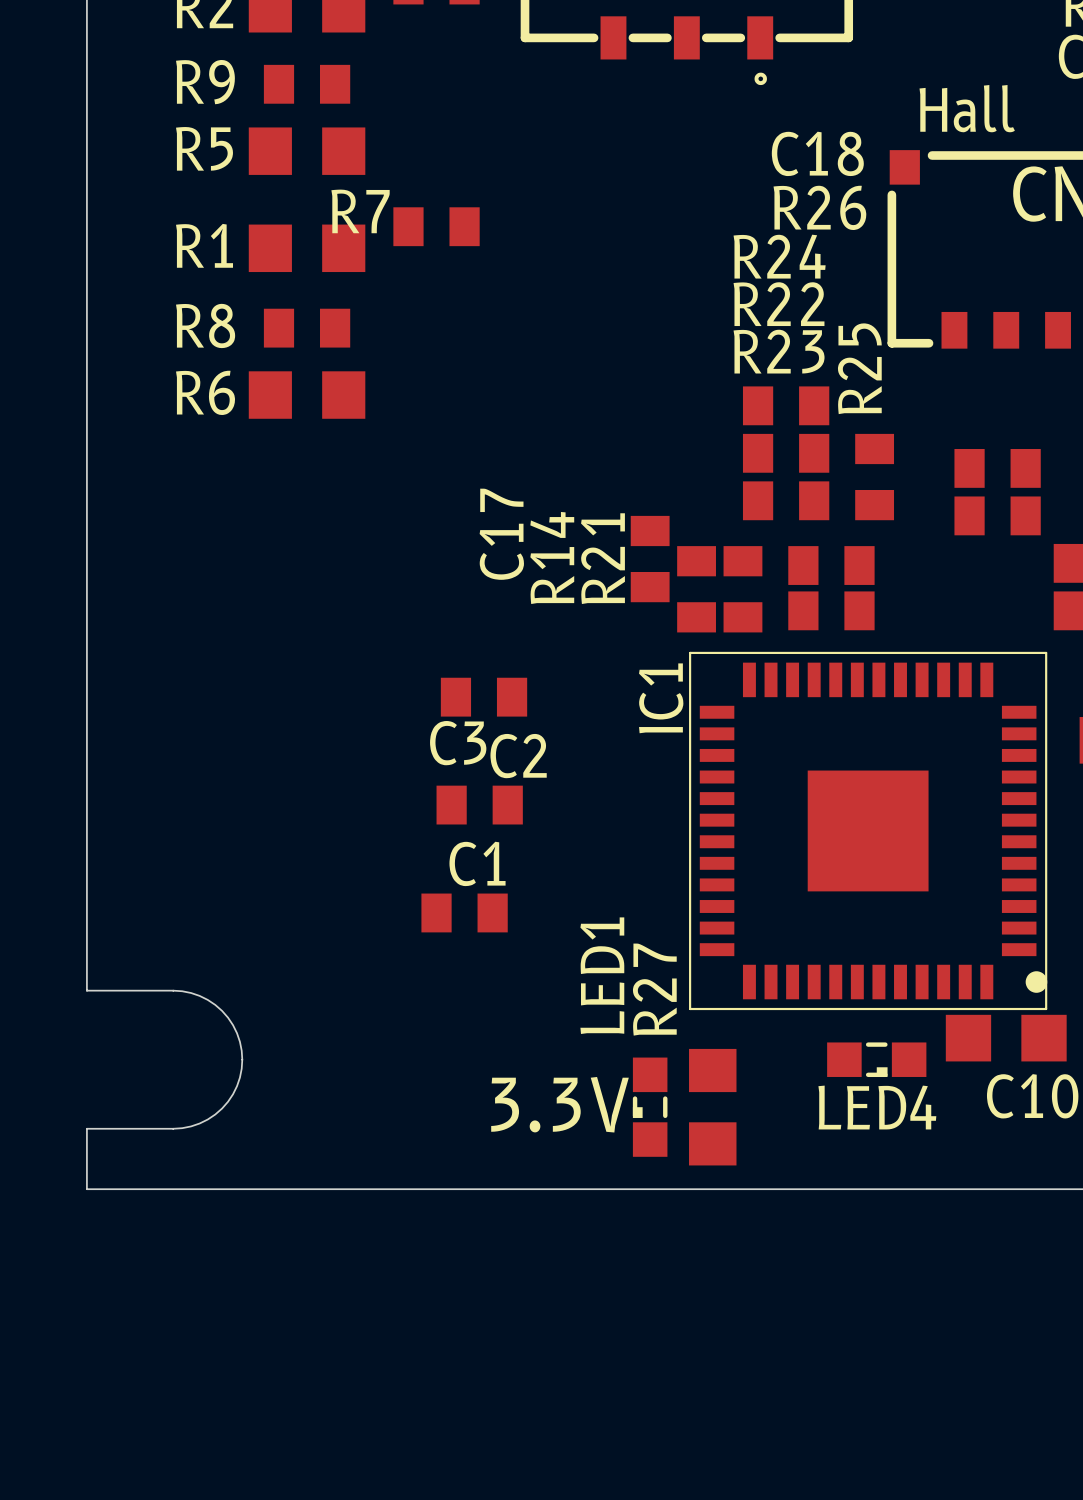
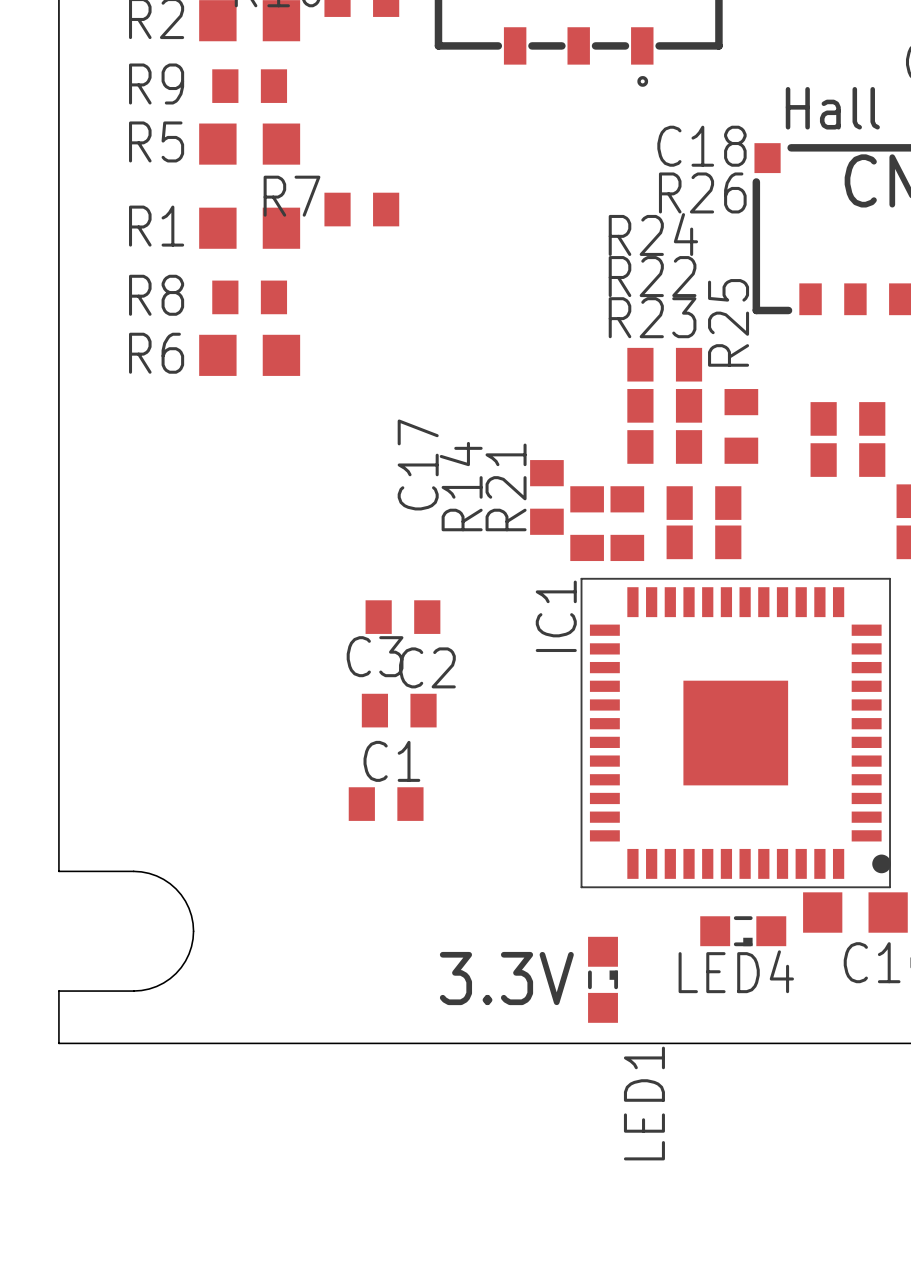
text position: 3.3V (559, 1104) -> 3.3V (506, 978)
LED1 rotation: 0° (650, 1107) -> 180° (603, 979)
LED1 position: (650, 1107) -> (603, 979)
R27: (712, 1107) -> none

